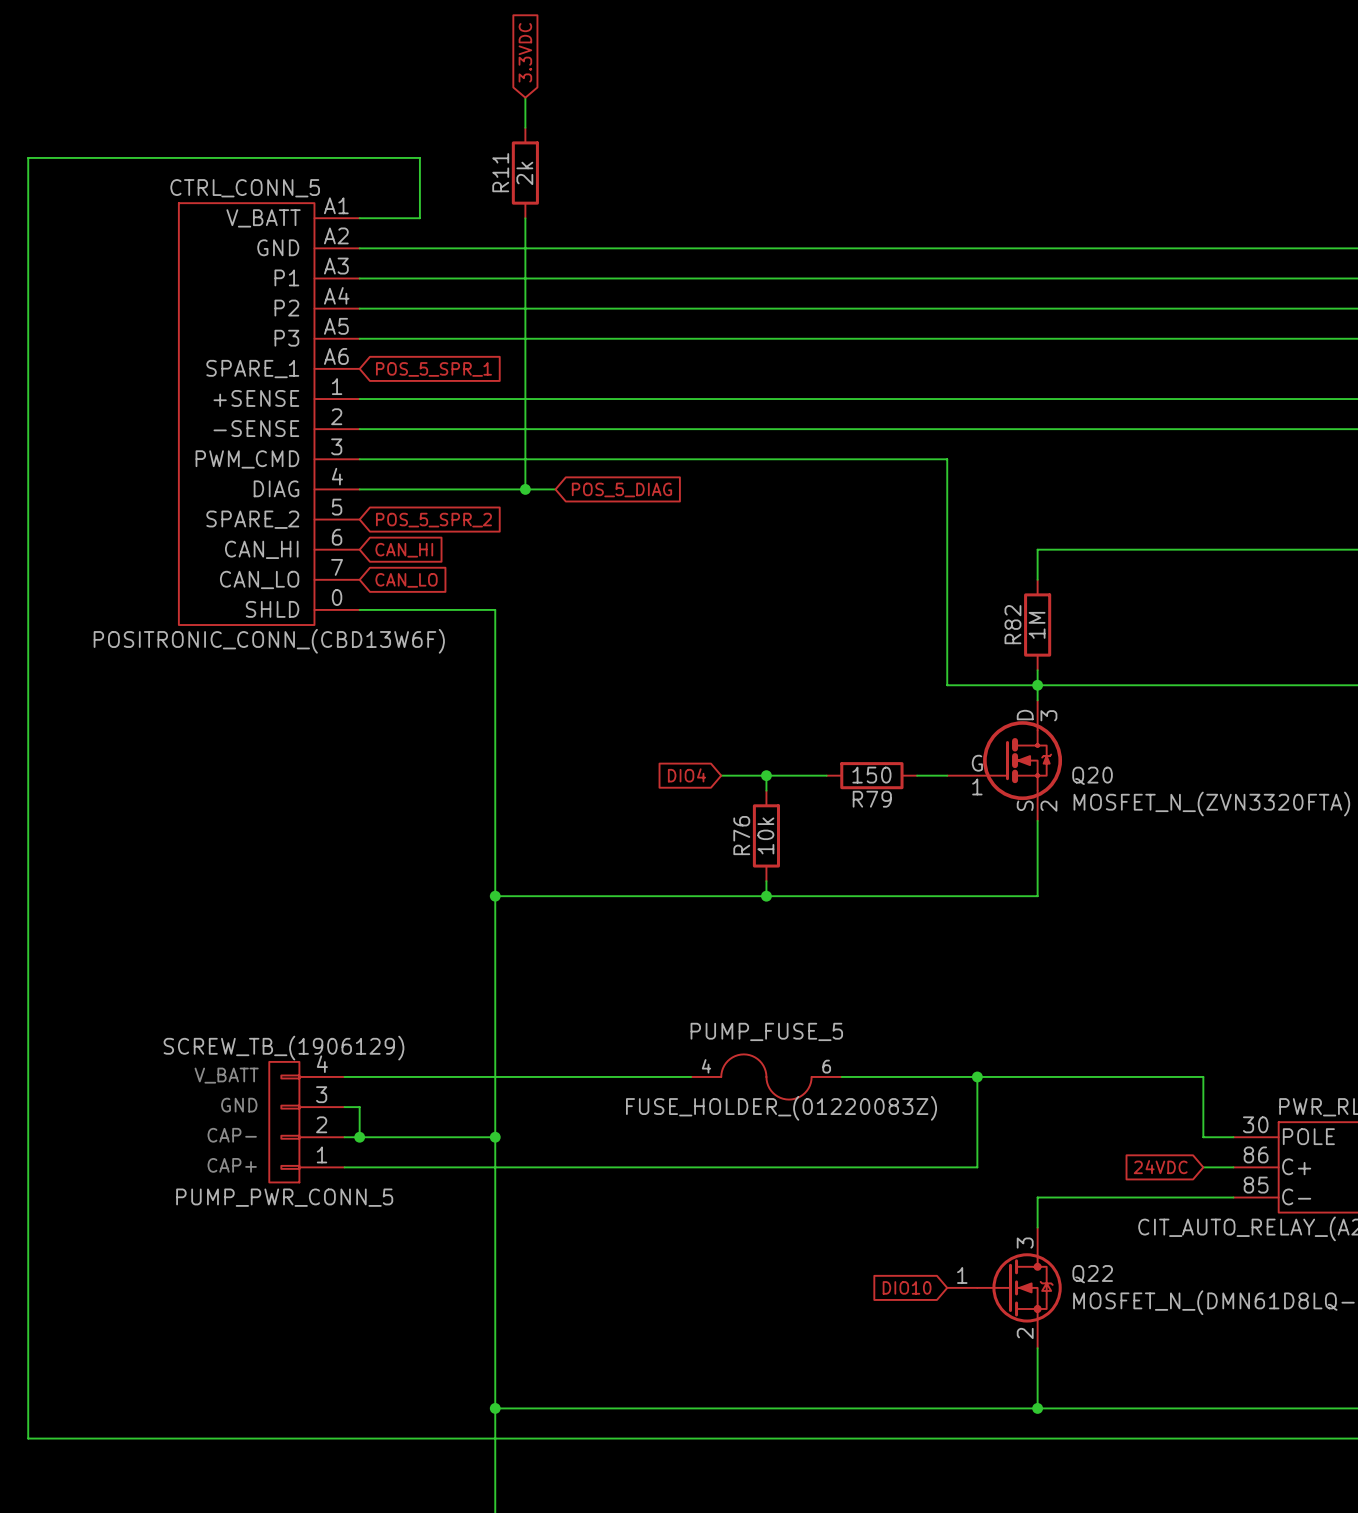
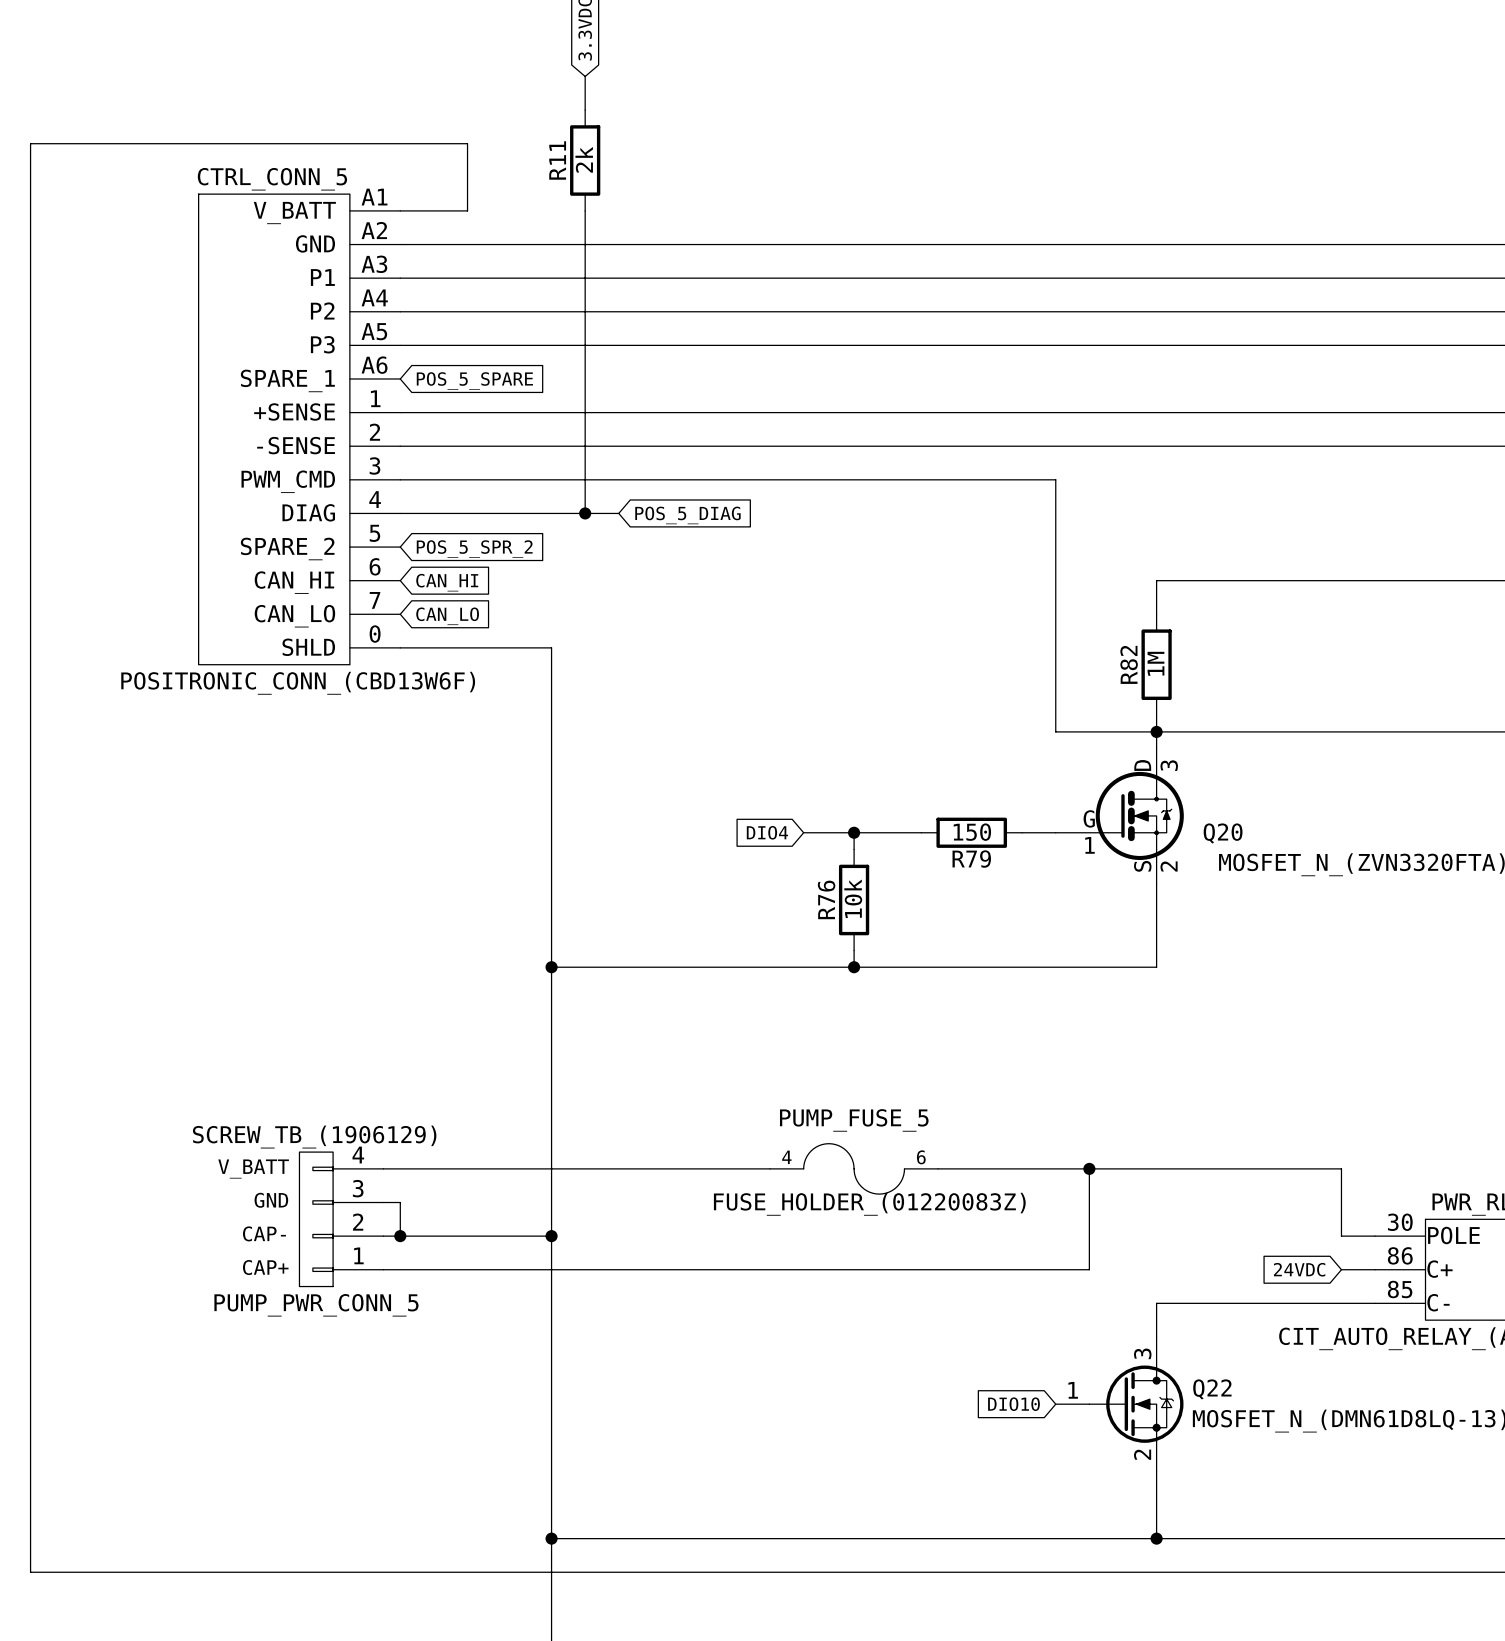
global label: POS_5_SPR_1 (433, 369) -> POS_5_SPARE (474, 380)

